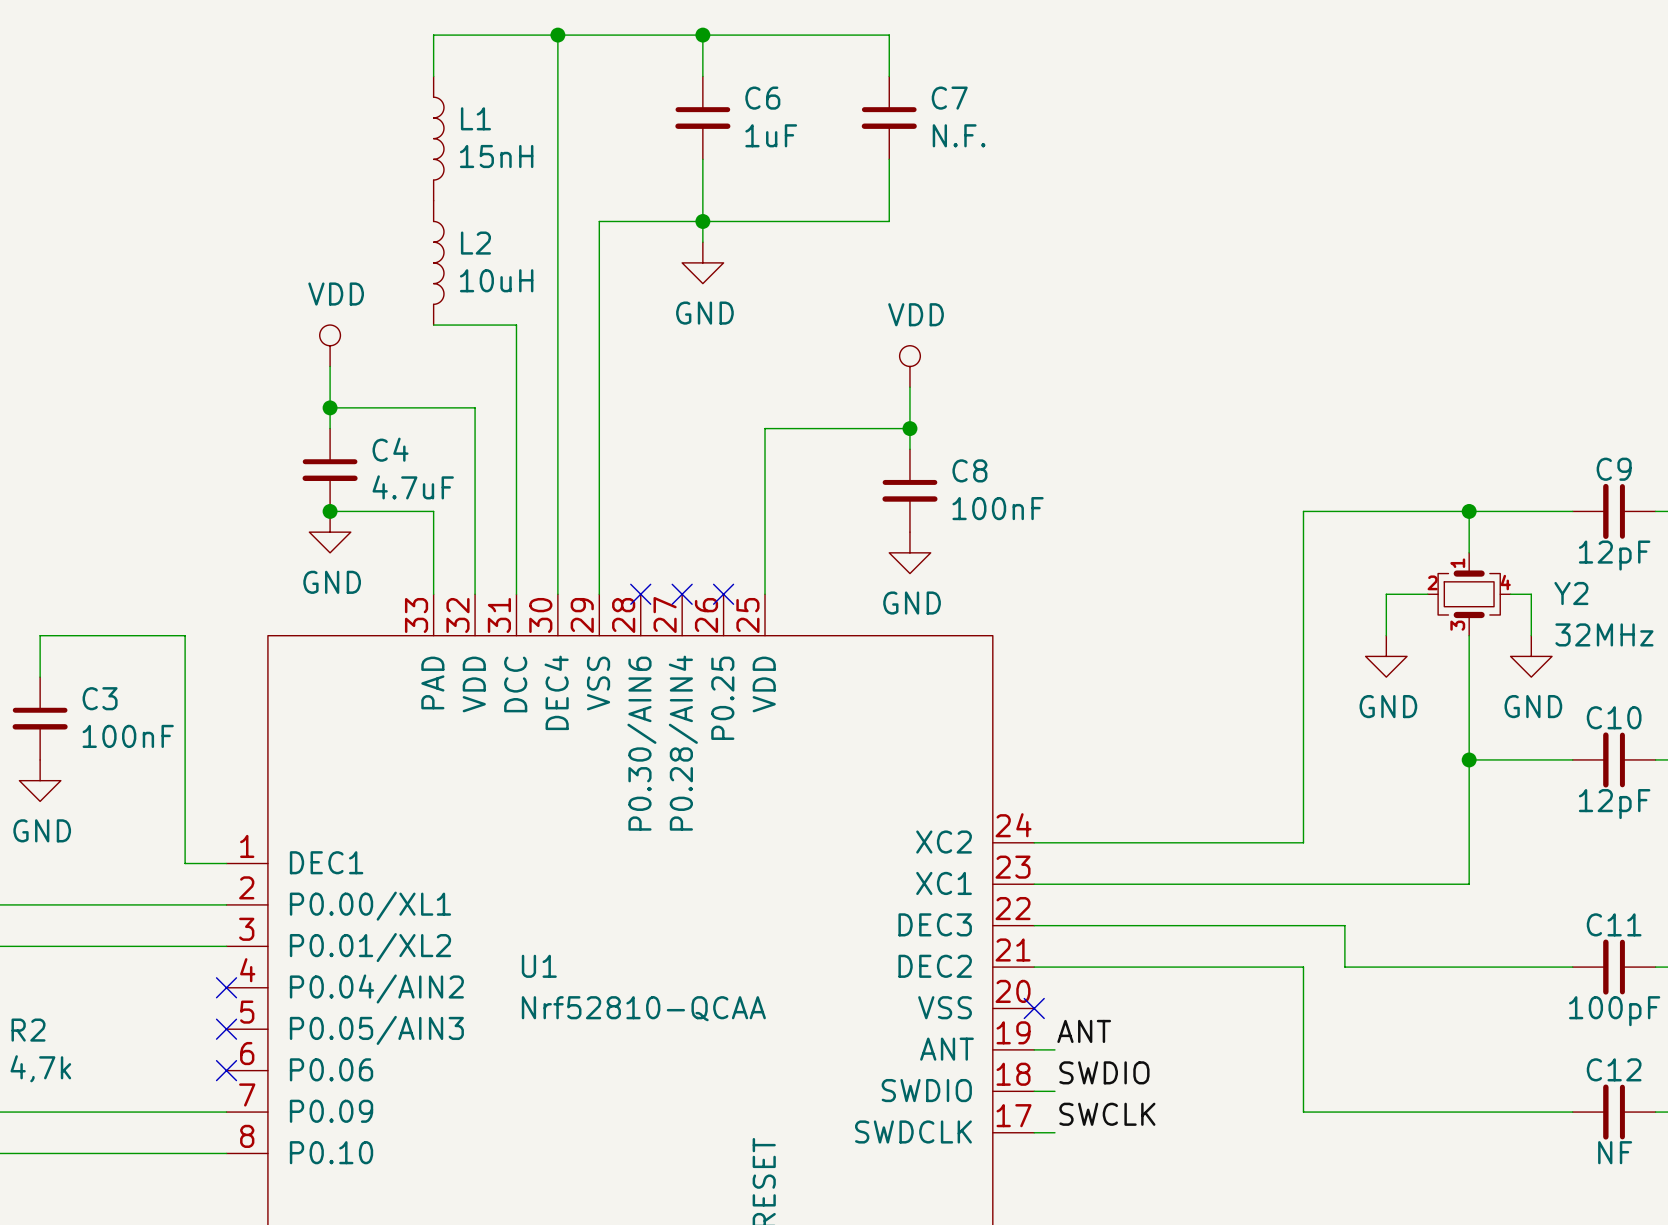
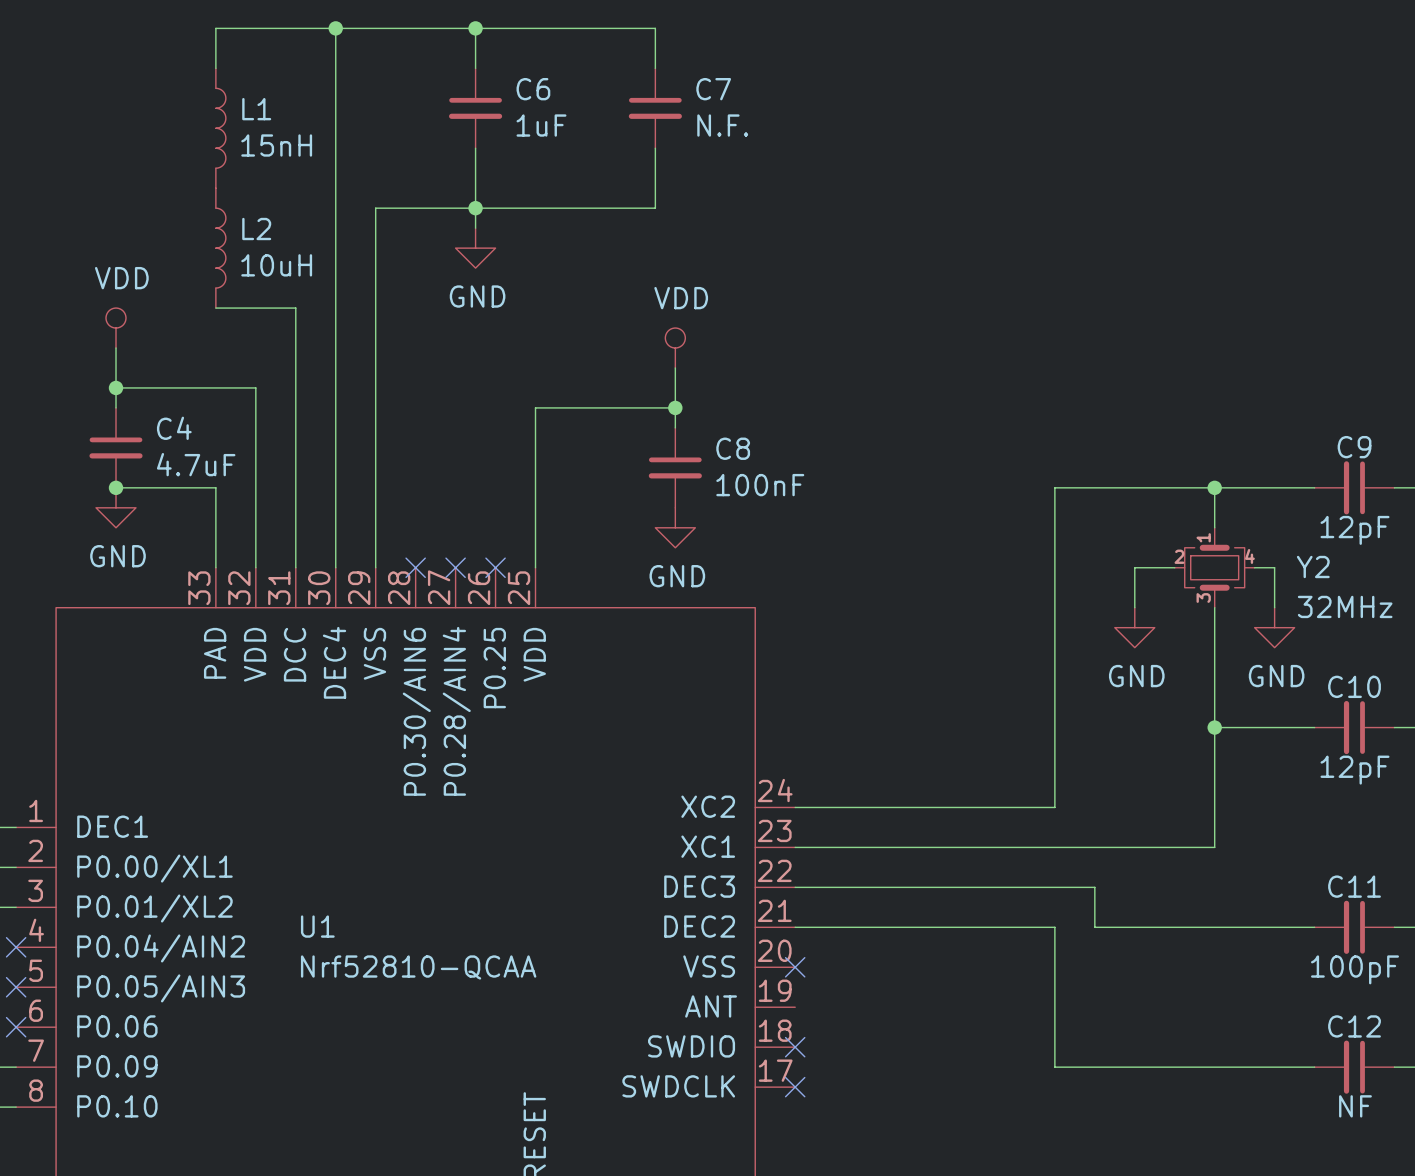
label: ANT (1084, 1031) -> none
wire: (1034, 1049) (1054, 1049) -> none
label: SWDIO (1104, 1072) -> none
wire: (1034, 1091) (1054, 1091) -> none
no-connect mark: none -> (795, 1047)
label: SWCLK (1107, 1114) -> none
wire: (1034, 1132) (1054, 1132) -> none
no-connect mark: none -> (795, 1087)

